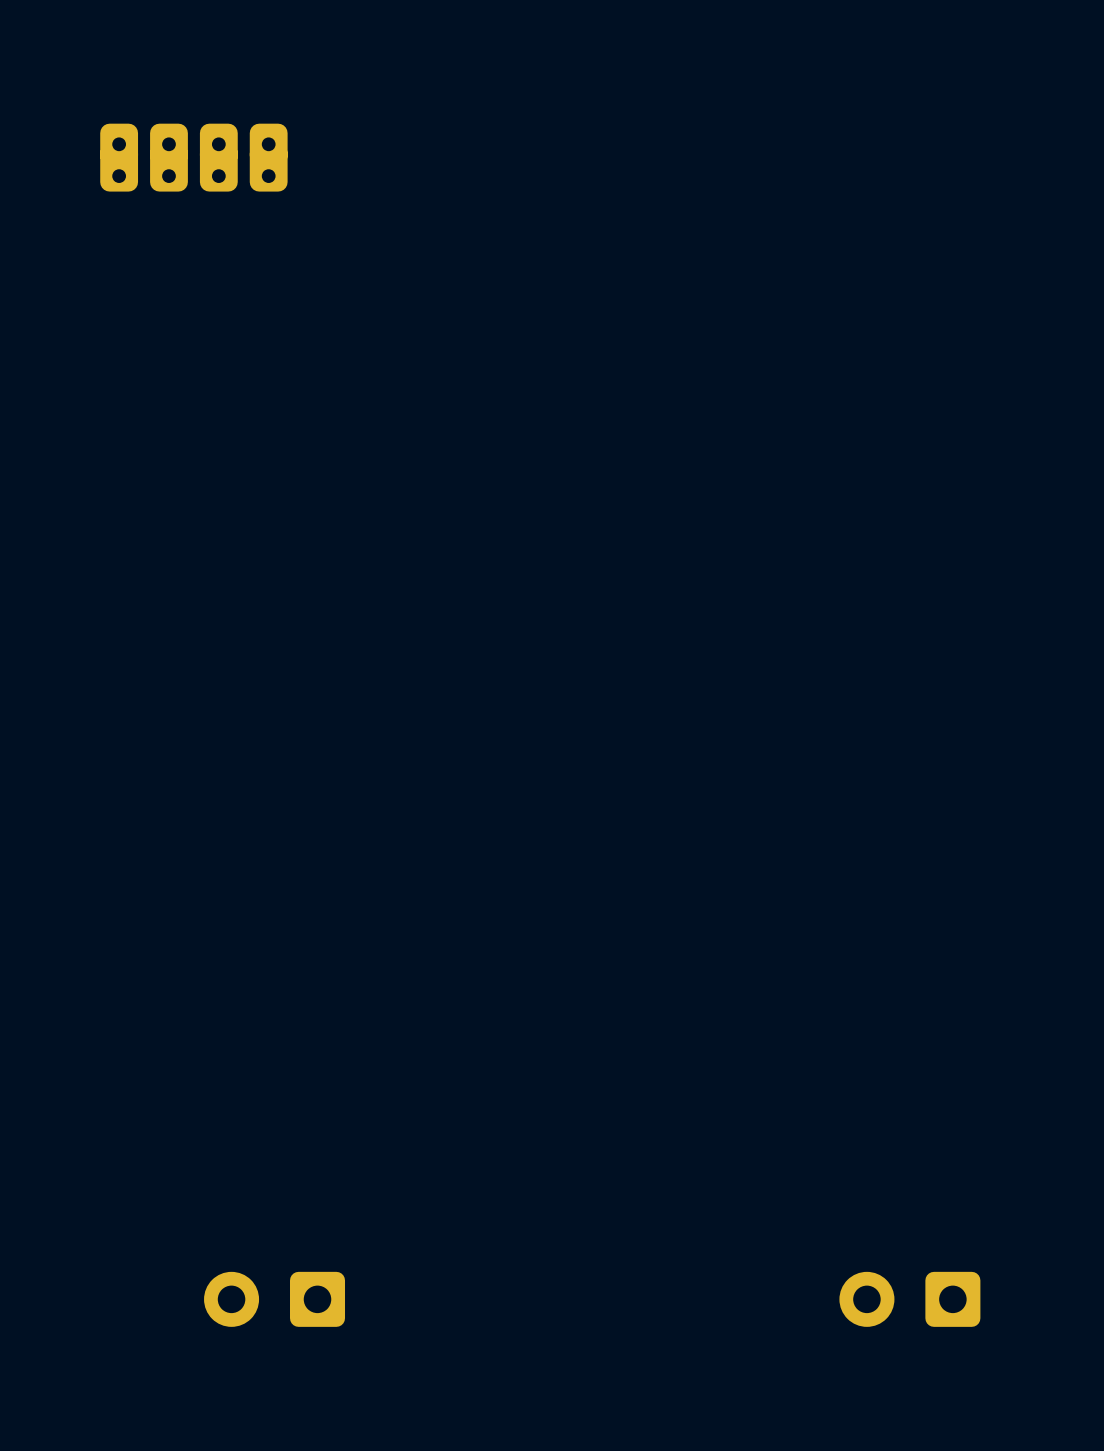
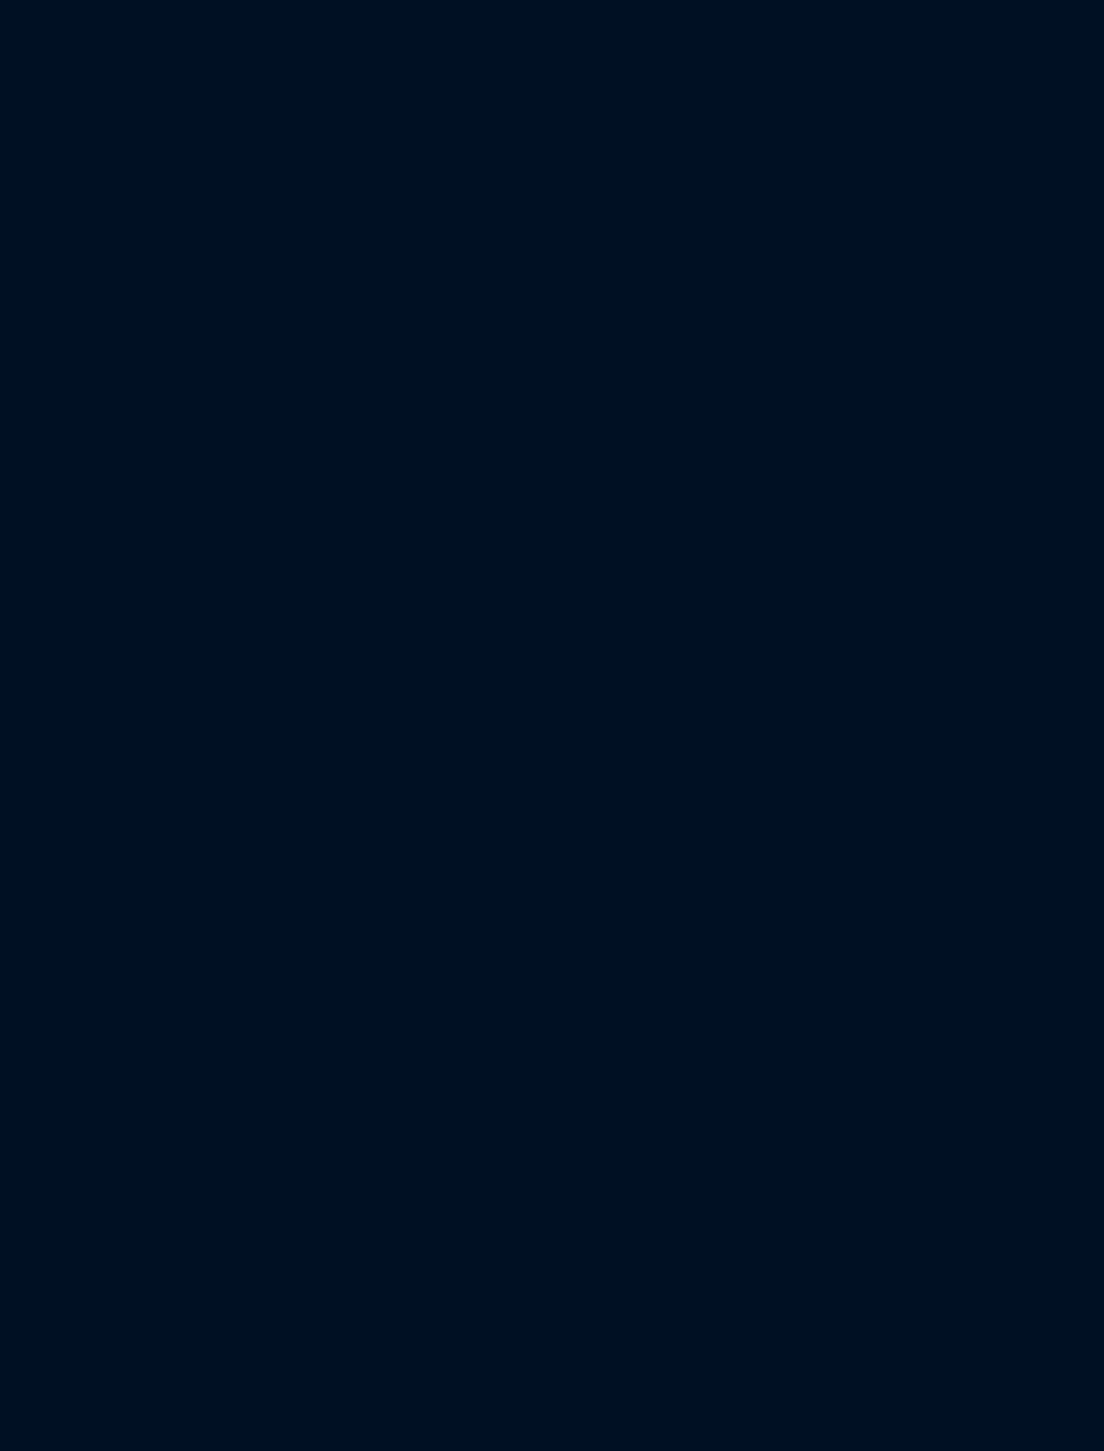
part: (193, 157) -> none
part: (274, 1299) -> none
part: (909, 1299) -> none

